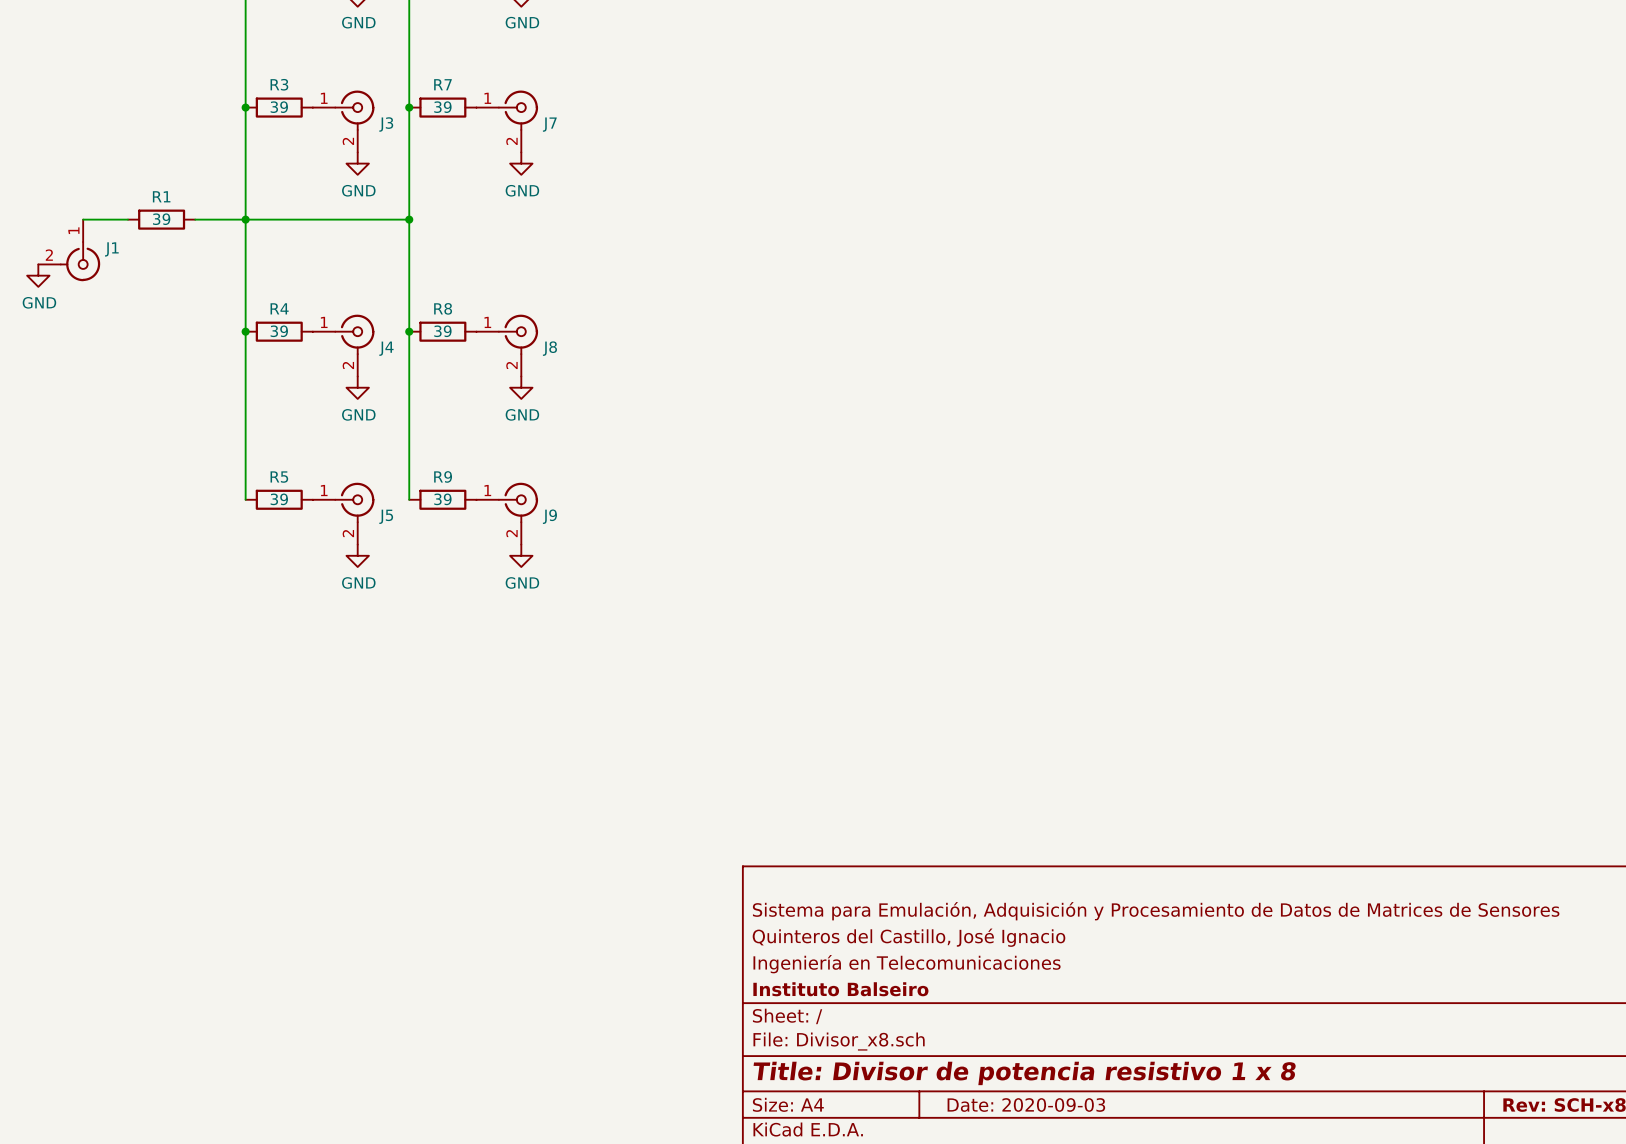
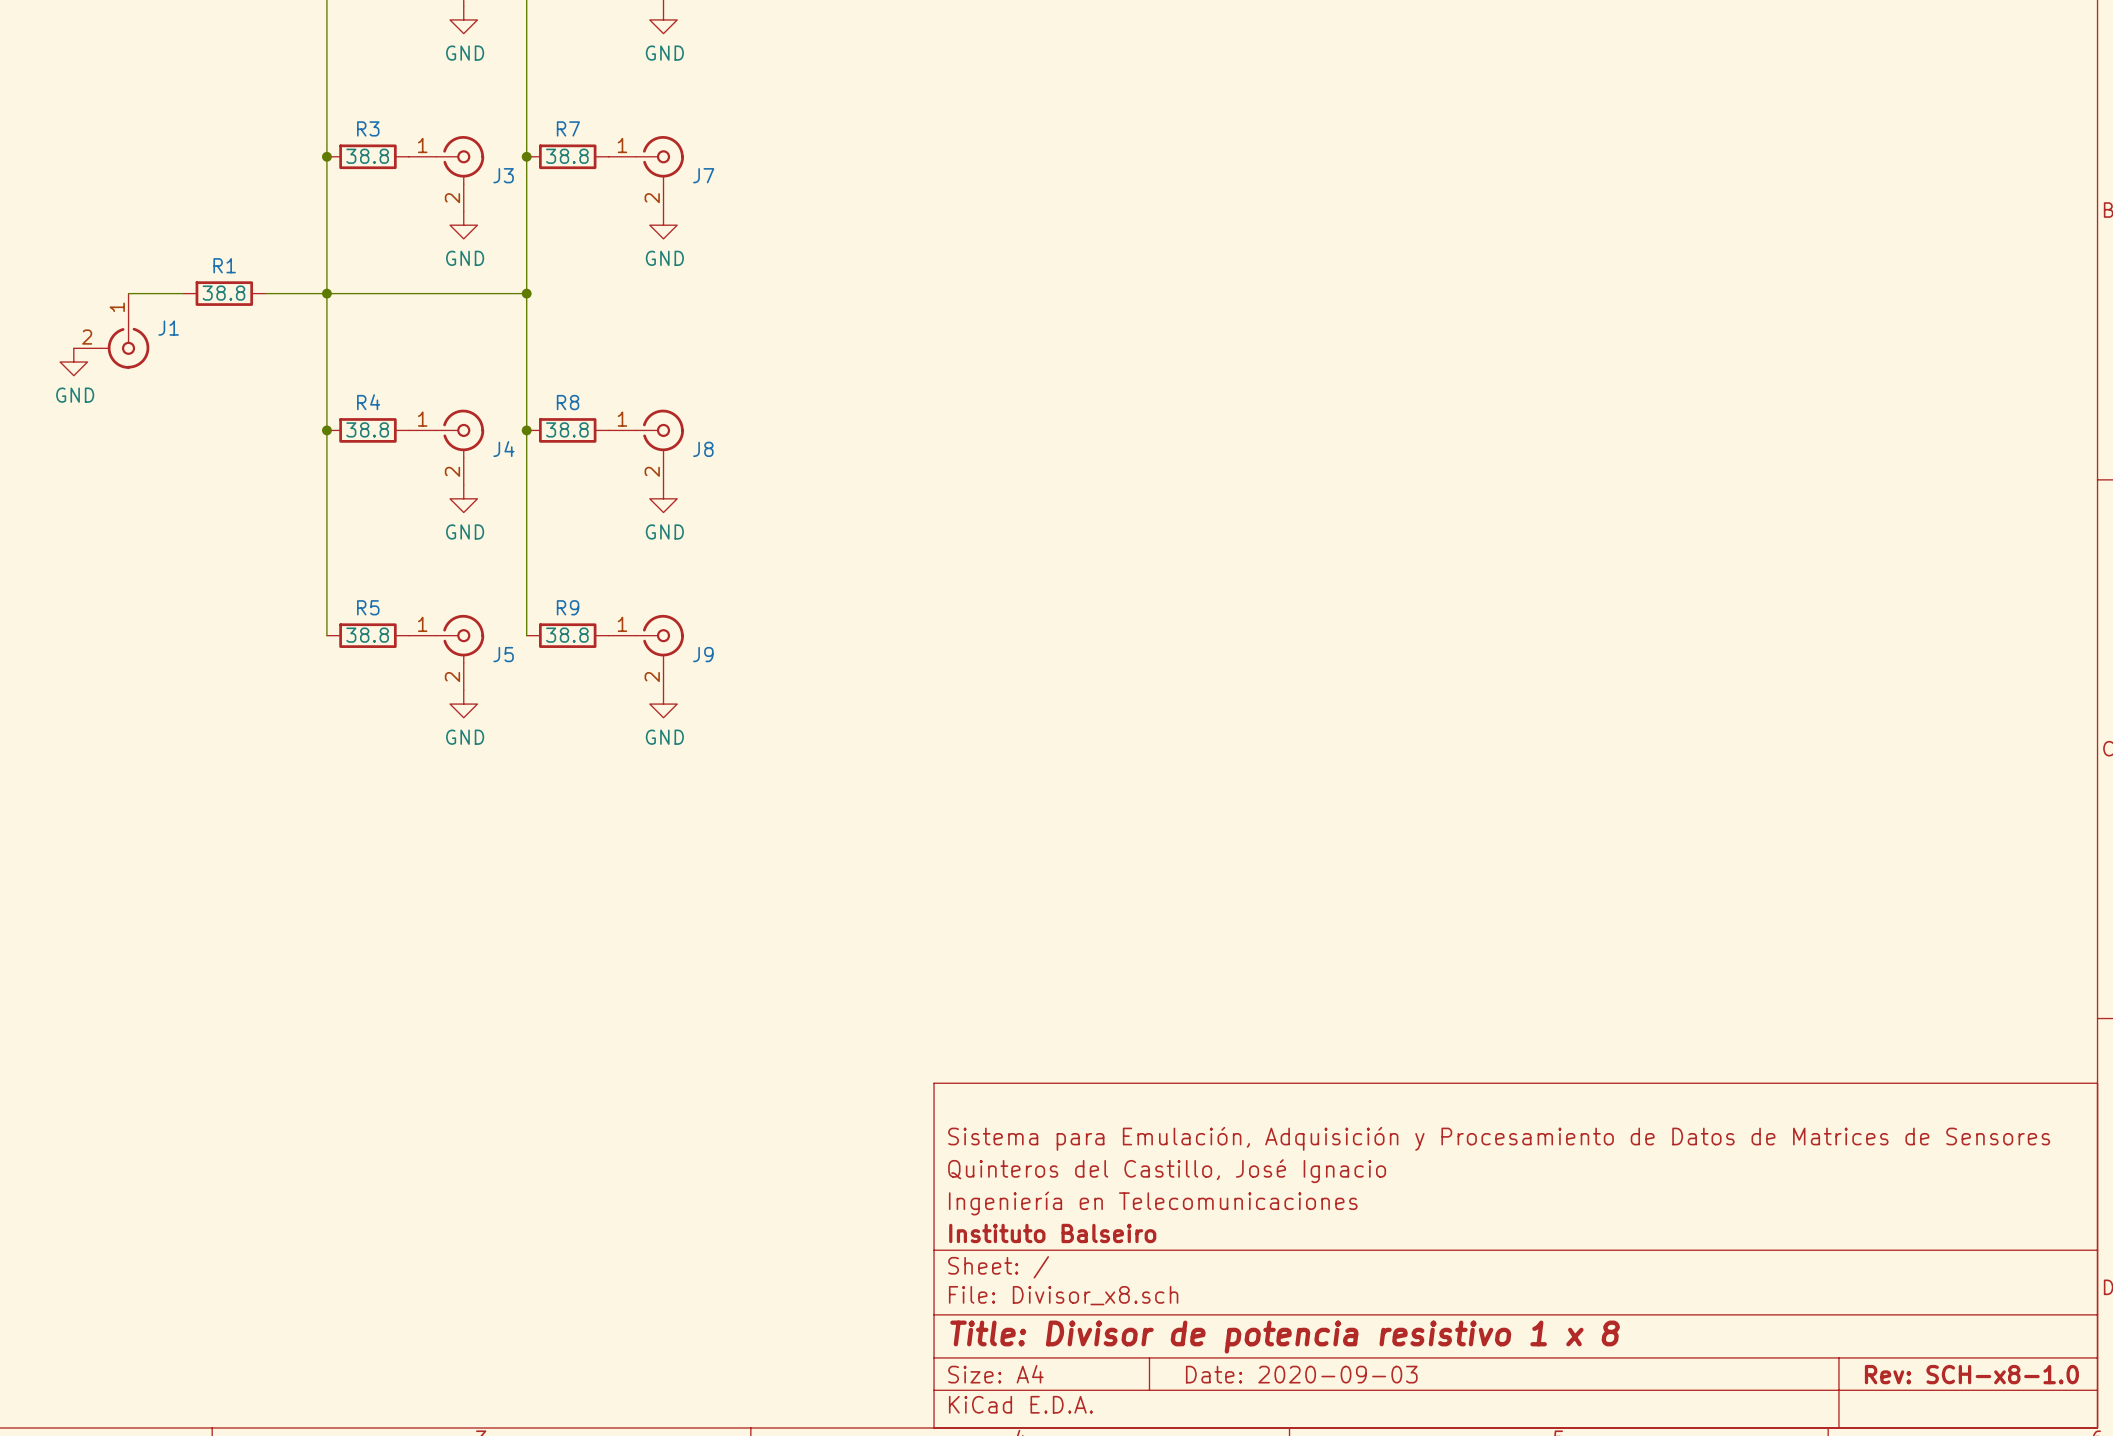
R3 value: 39 (279, 107) -> 38.8 (367, 156)
R7 value: 39 (442, 107) -> 38.8 (567, 156)
R1 value: 39 (161, 219) -> 38.8 (223, 293)
R4 value: 39 (279, 331) -> 38.8 (367, 429)
R8 value: 39 (442, 331) -> 38.8 (567, 429)
R5 value: 39 (279, 499) -> 38.8 (367, 635)
R9 value: 39 (442, 499) -> 38.8 (567, 635)

